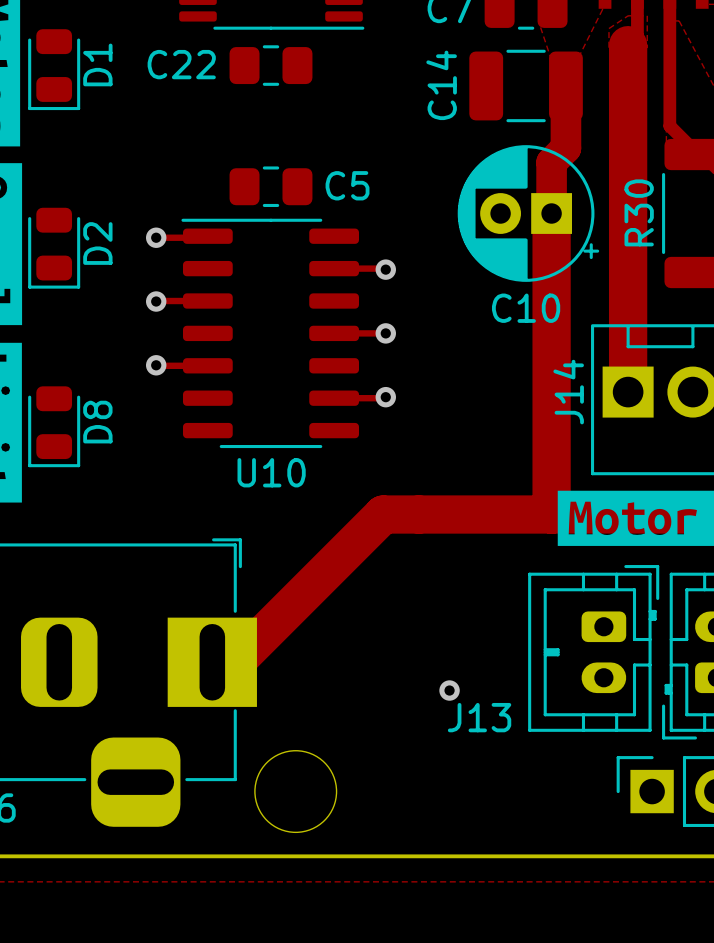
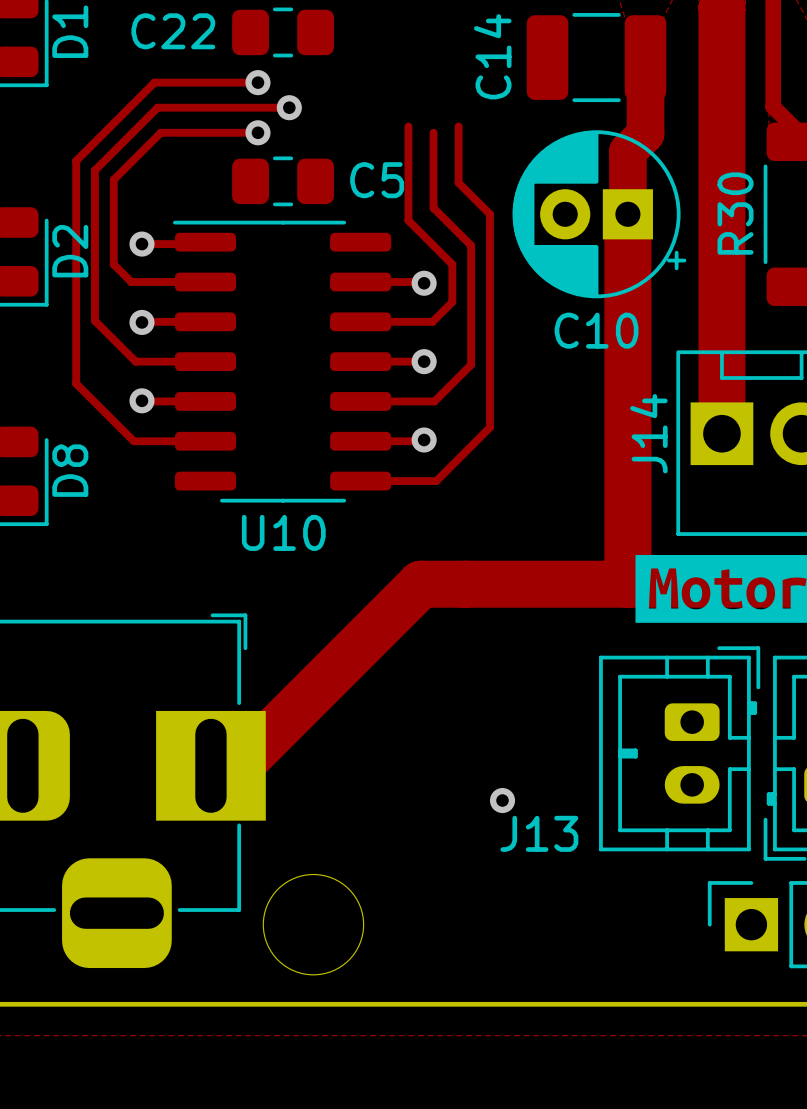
track: none -> (257, 82) (154, 82) (76, 160) (76, 383) (133, 441) (205, 441)
via: none -> (257, 82)
track: none -> (289, 107) (157, 107) (94, 170) (94, 320) (135, 361) (205, 361)
via: none -> (289, 107)
track: none -> (408, 126) (408, 220) (452, 264) (452, 302) (432, 321) (360, 321)
track: none -> (458, 126) (458, 182) (489, 214) (489, 427) (436, 481) (360, 481)
track: none -> (257, 132) (160, 132) (113, 179) (113, 264) (131, 282) (205, 282)
via: none -> (257, 132)
track: none -> (433, 132) (433, 208) (471, 245) (471, 364) (434, 401) (360, 401)

